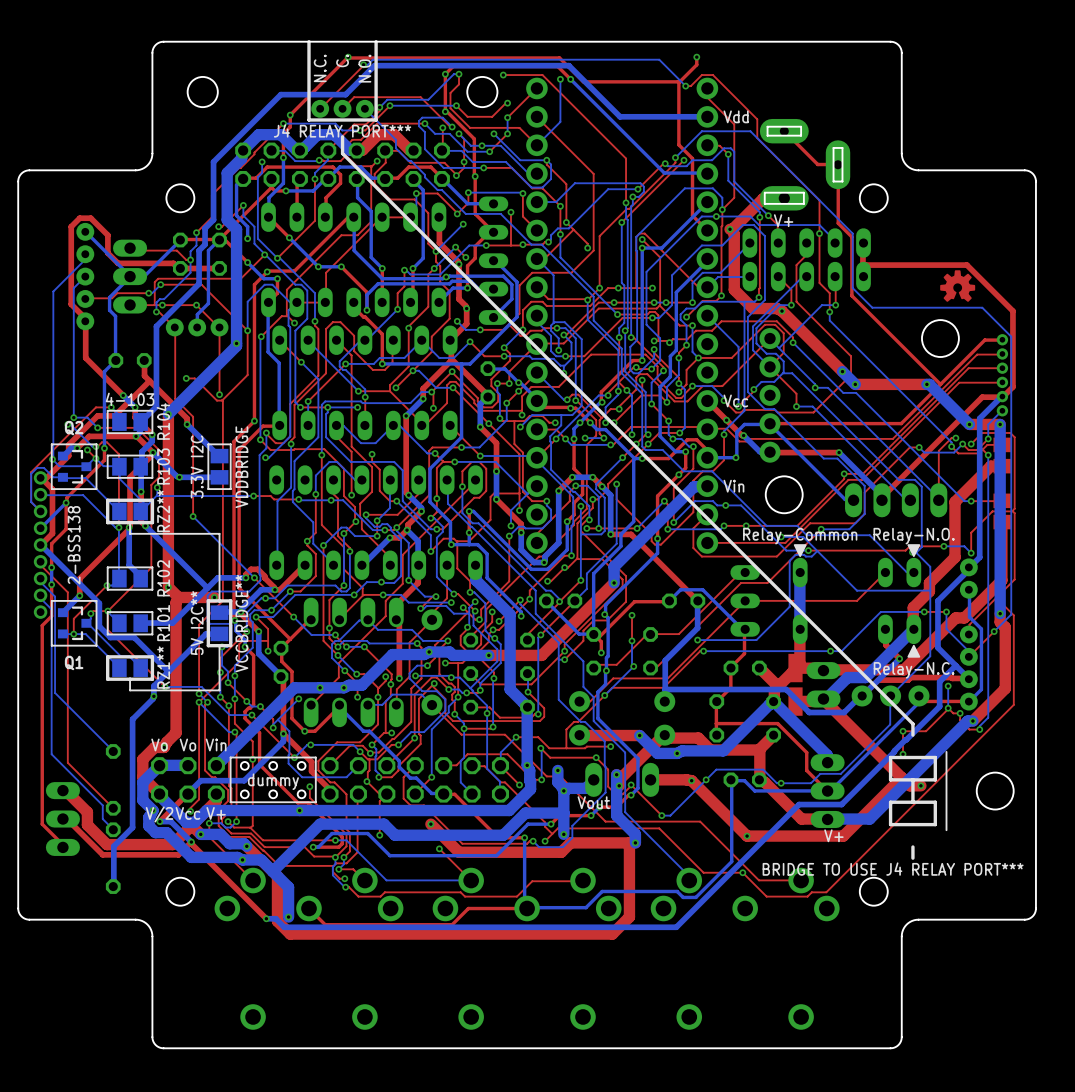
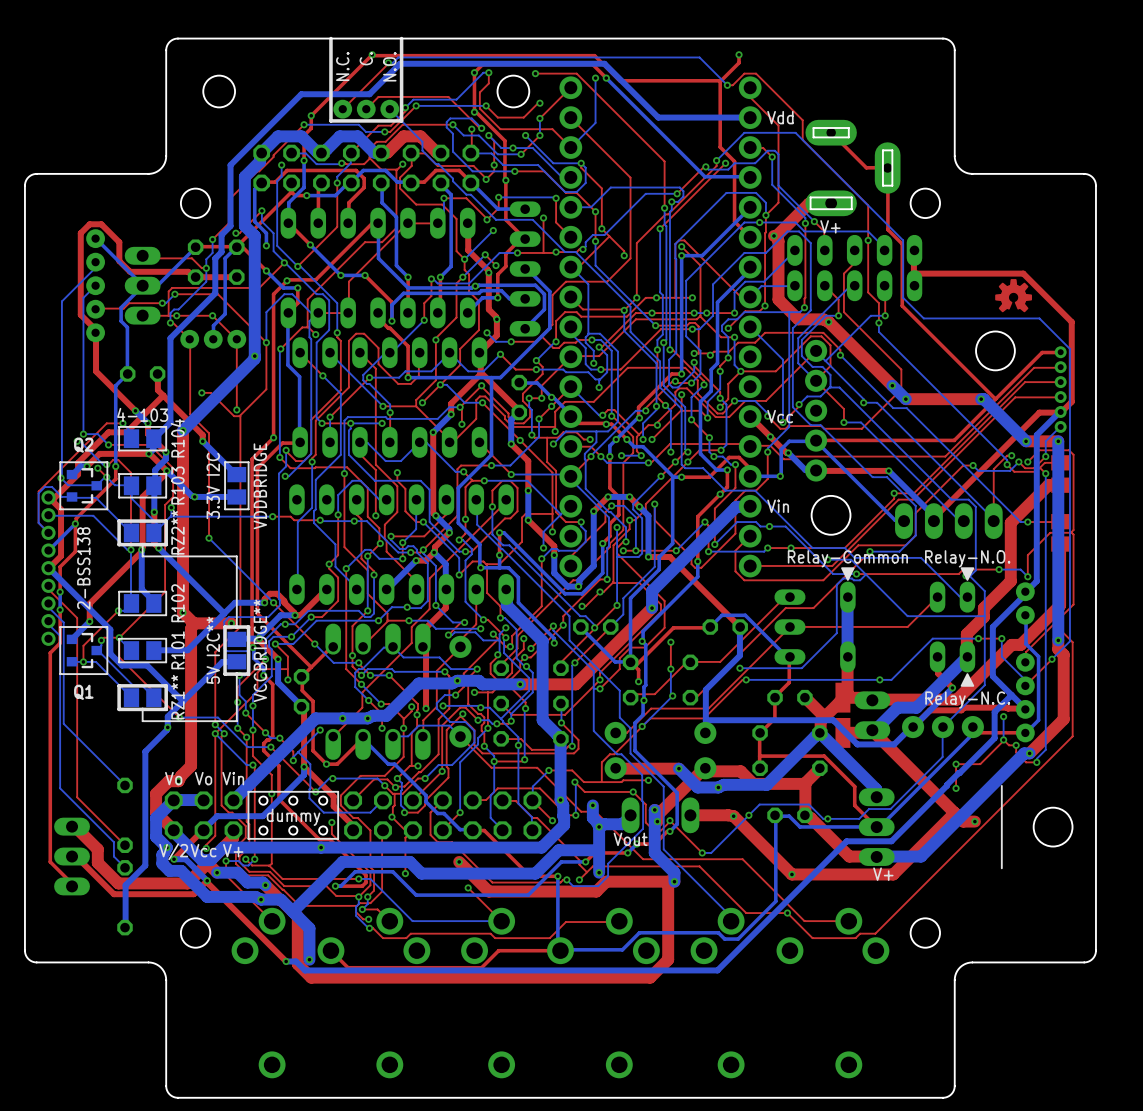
text: J4 RELAY PORT*** (342, 130) -> none
line: (342, 136) (342, 153) (912, 723) (912, 735) -> none
line: (935, 757) (890, 757) (890, 779) (935, 779) (935, 757) -> none
line: (912, 779) (912, 802) -> none
line: (935, 802) (935, 824) (890, 824) (890, 802) (935, 802) -> none
line: (912, 846) (912, 858) -> none
text: BRIDGE TO USE J4 RELAY PORT*** (893, 869) -> none

